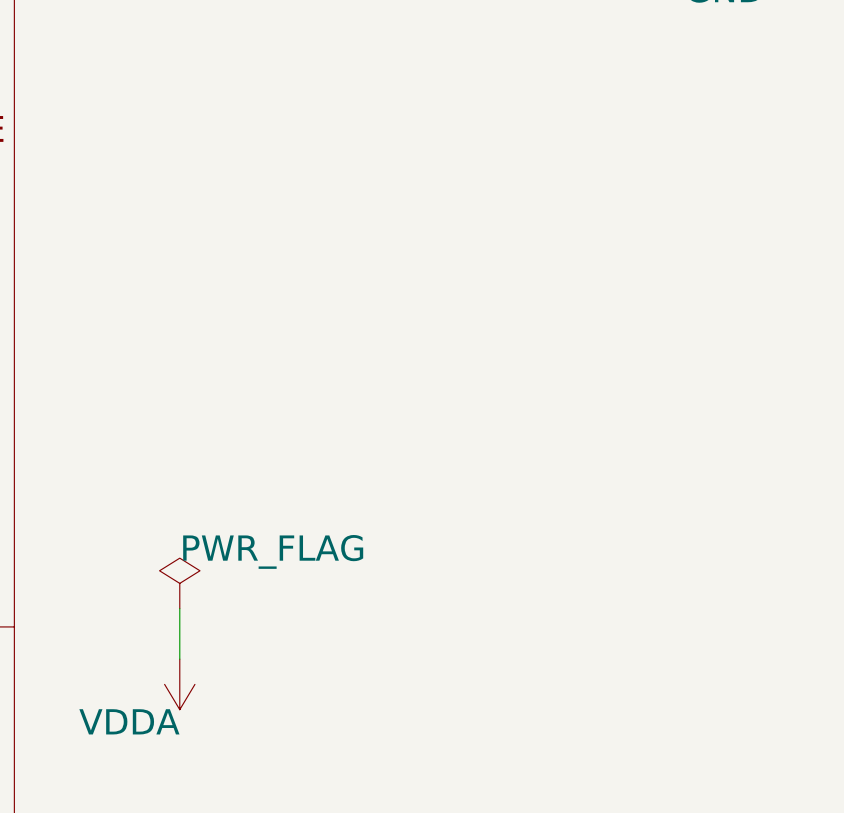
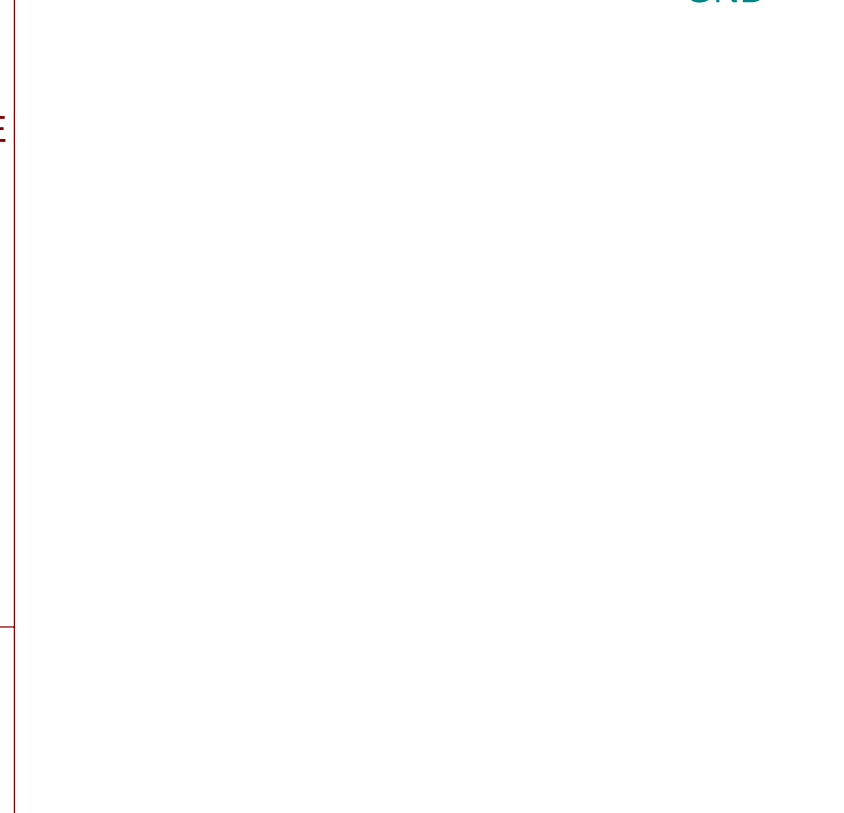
power symbol: PWR_FLAG (179, 583) -> none
wire: (179, 608) (179, 659) -> none
power symbol: VDDA (179, 684) -> none

